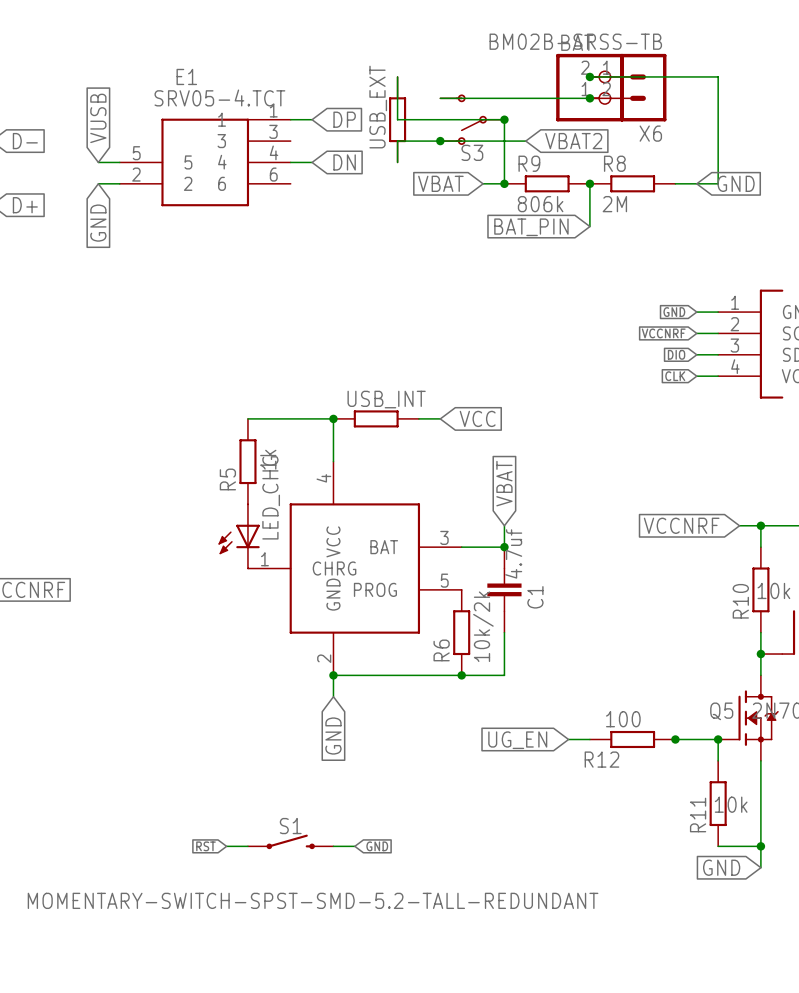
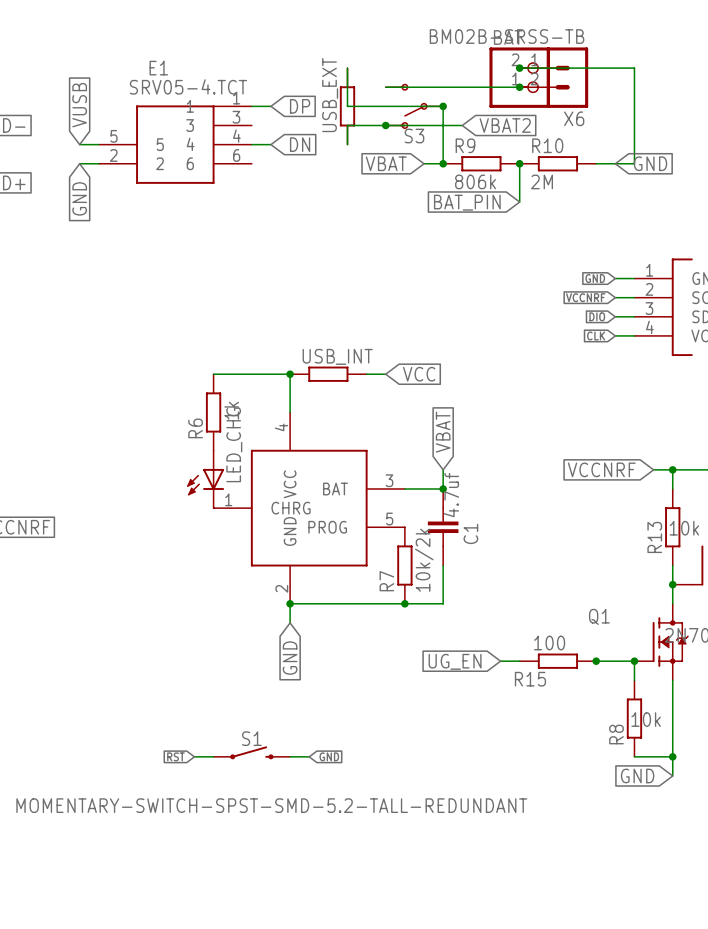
R8 name: R8 (614, 163) -> R10 (547, 145)
R5 name: R5 (227, 479) -> R6 (195, 428)
R10 name: R10 (740, 601) -> R13 (654, 537)
R6 name: R6 (441, 650) -> R7 (386, 581)
Q5 name: Q5 (721, 711) -> Q1 (599, 616)
R12 name: R12 (601, 759) -> R15 (530, 679)
R11 name: R11 (698, 815) -> R8 (616, 734)

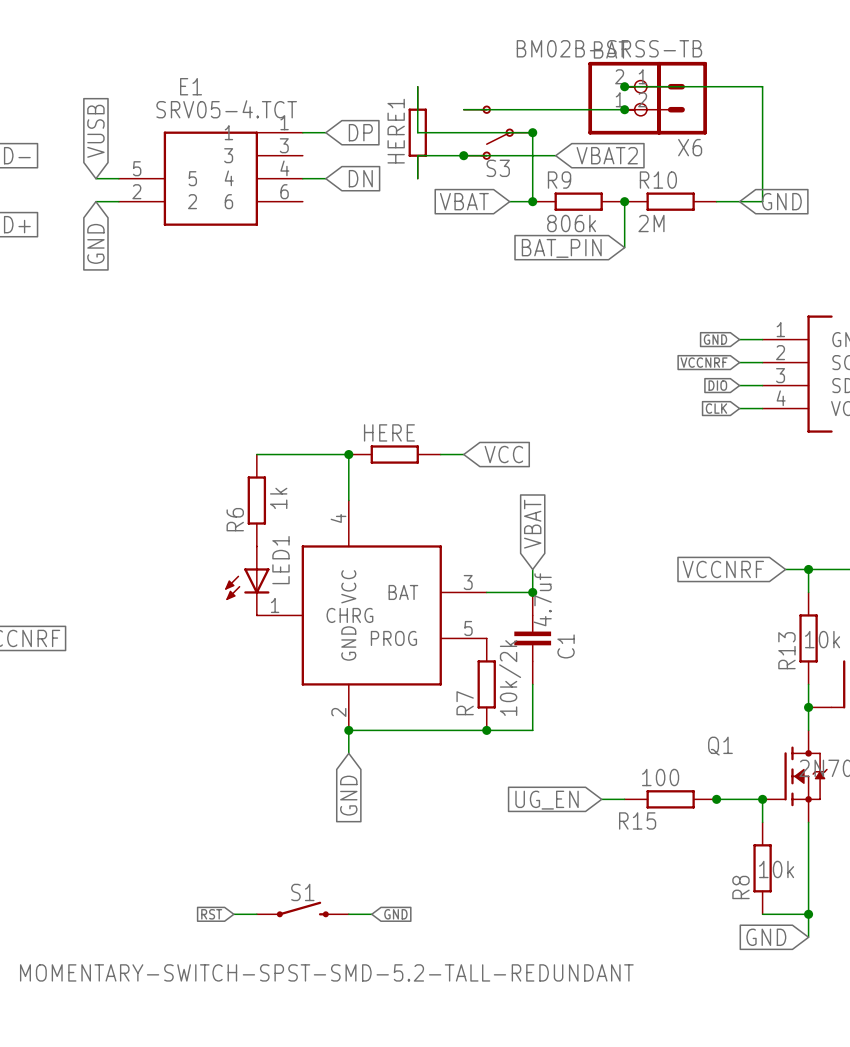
USB_EXT name: USB_EXT (330, 95) -> HERE1 (396, 131)
USB_INT name: USB_INT (337, 356) -> HERE (389, 432)
LED_CHG name: LED_CHG (234, 444) -> LED1 (280, 560)

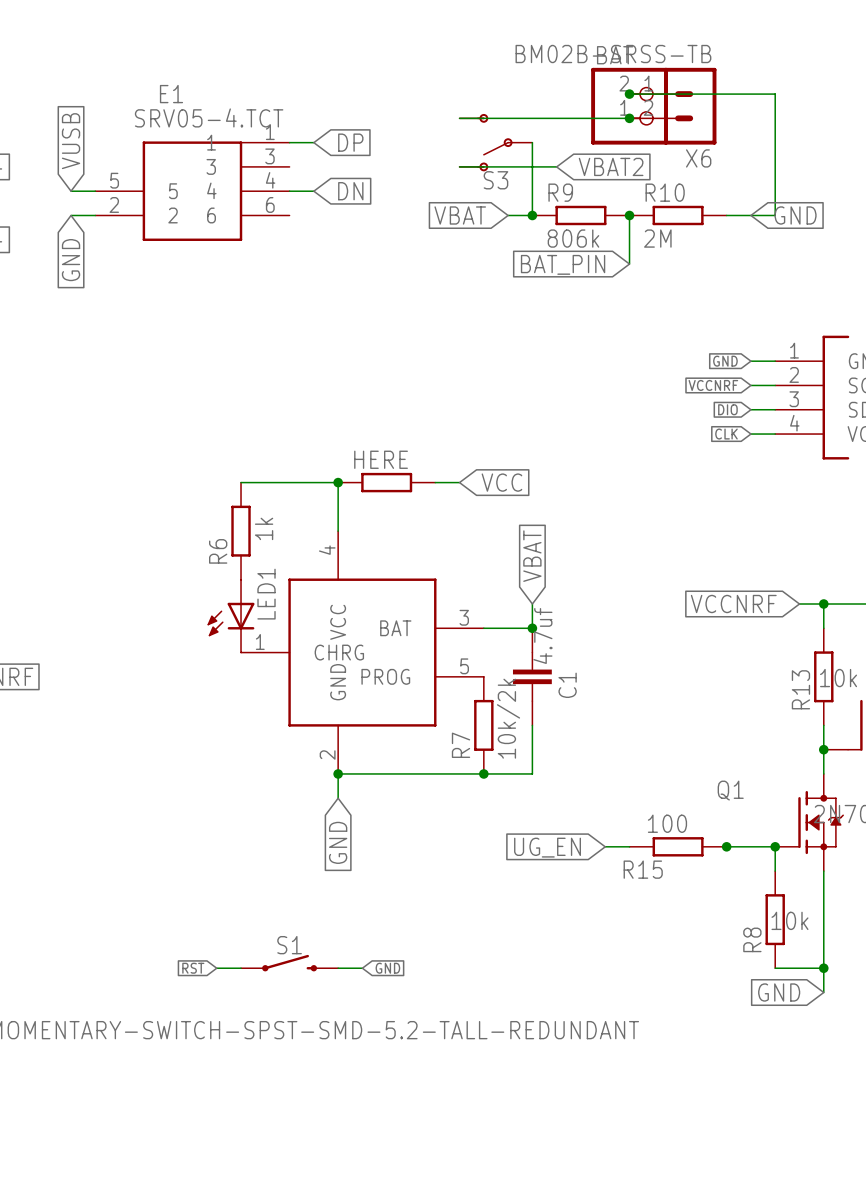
wire: (417, 86) (417, 132) (532, 132) -> none
HERE1: (417, 132) -> none
junction: (532, 132) -> none
wire: (463, 155) (417, 155) (417, 178) -> none
junction: (463, 155) -> none

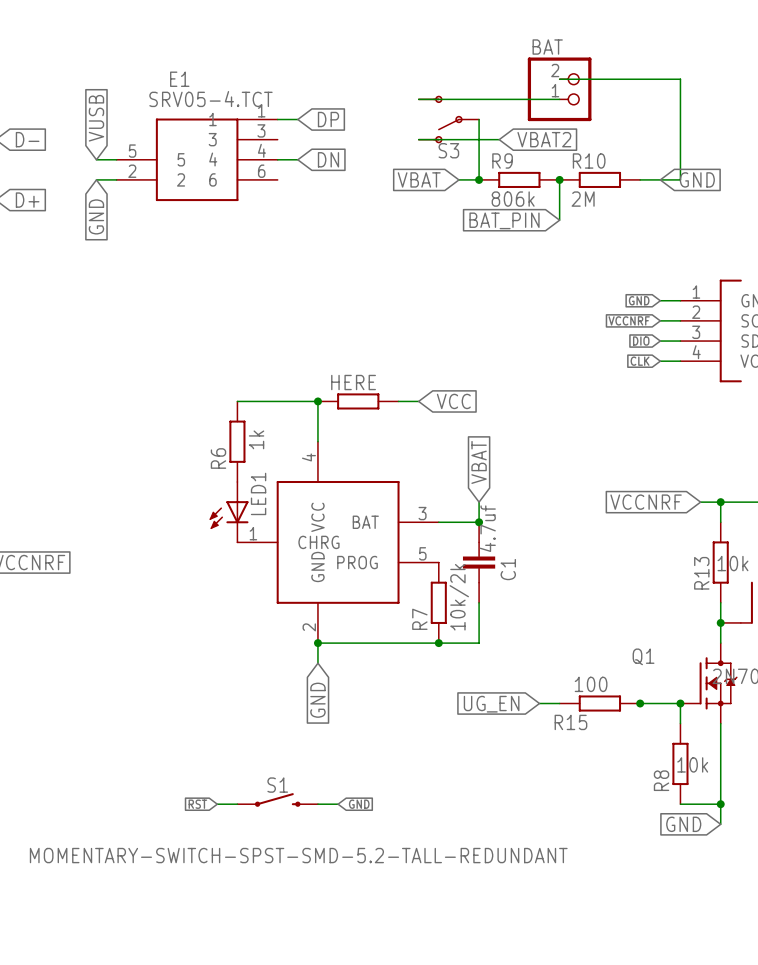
junction: (629, 94) -> none
X6: BM02B-SRSS-TB (672, 106) -> none
junction: (629, 118) -> none

